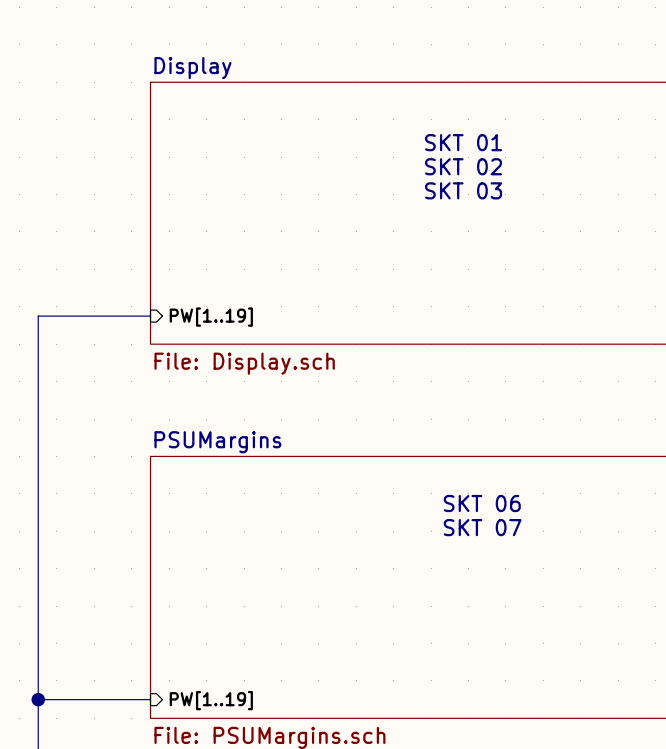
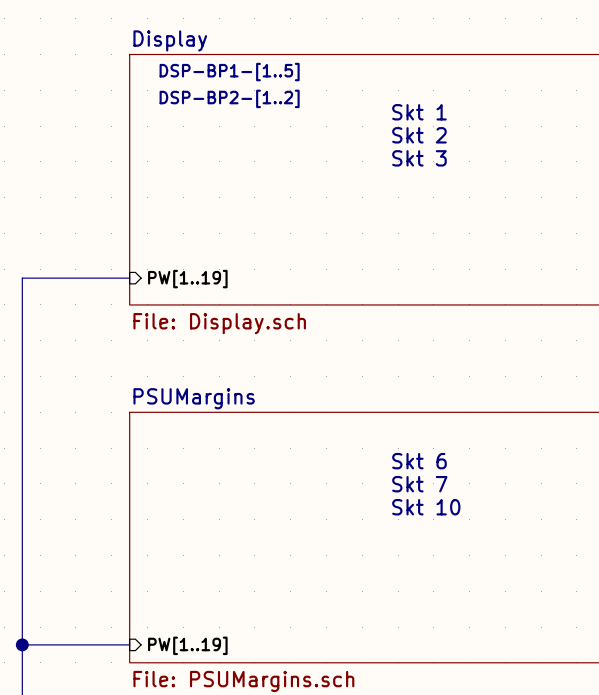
text: none -> DSP-BP1-[1..5] (229, 72)
text: none -> DSP-BP2-[1..2] (229, 98)
text: SKT 01 (463, 142) -> Skt 1 (419, 112)
text: SKT 02 (463, 166) -> Skt 2 (419, 135)
text: SKT 03 (463, 190) -> Skt 3 (419, 158)
text: SKT 06 (482, 503) -> none
text: none -> Skt 6 (419, 461)
text: SKT 07 (482, 527) -> none
text: none -> Skt 7 (419, 484)
text: none -> Skt 10 (426, 507)

